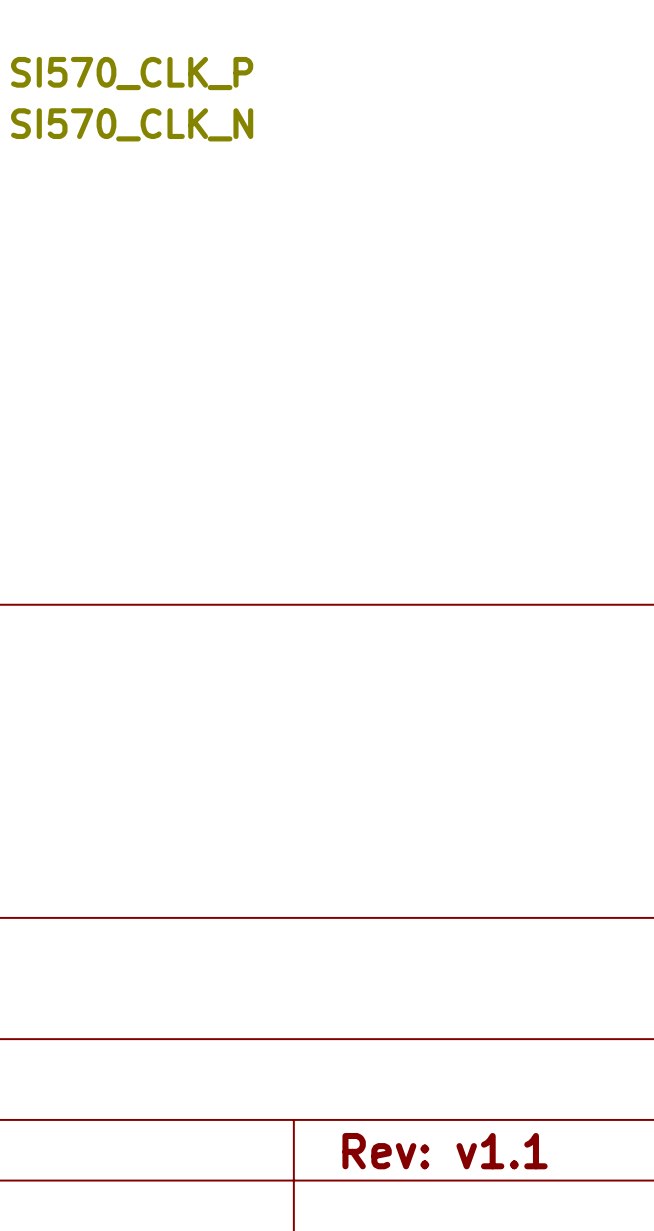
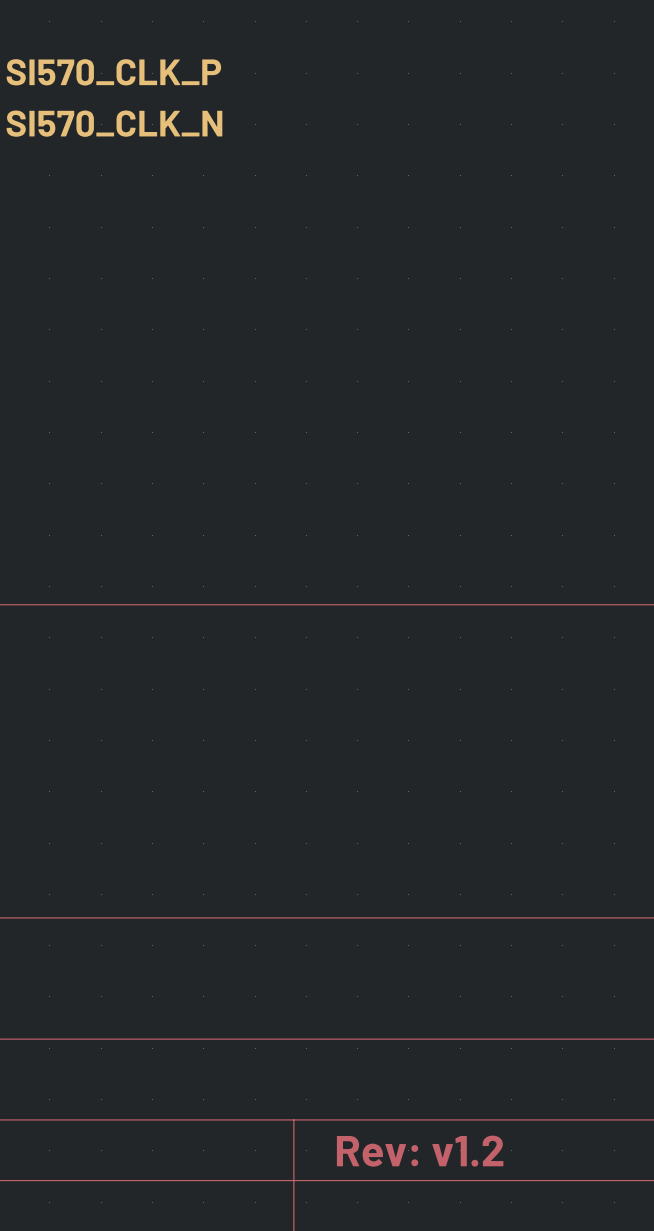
title block: Rev: v1.1 (445, 1151) -> Rev: v1.2 (420, 1151)

